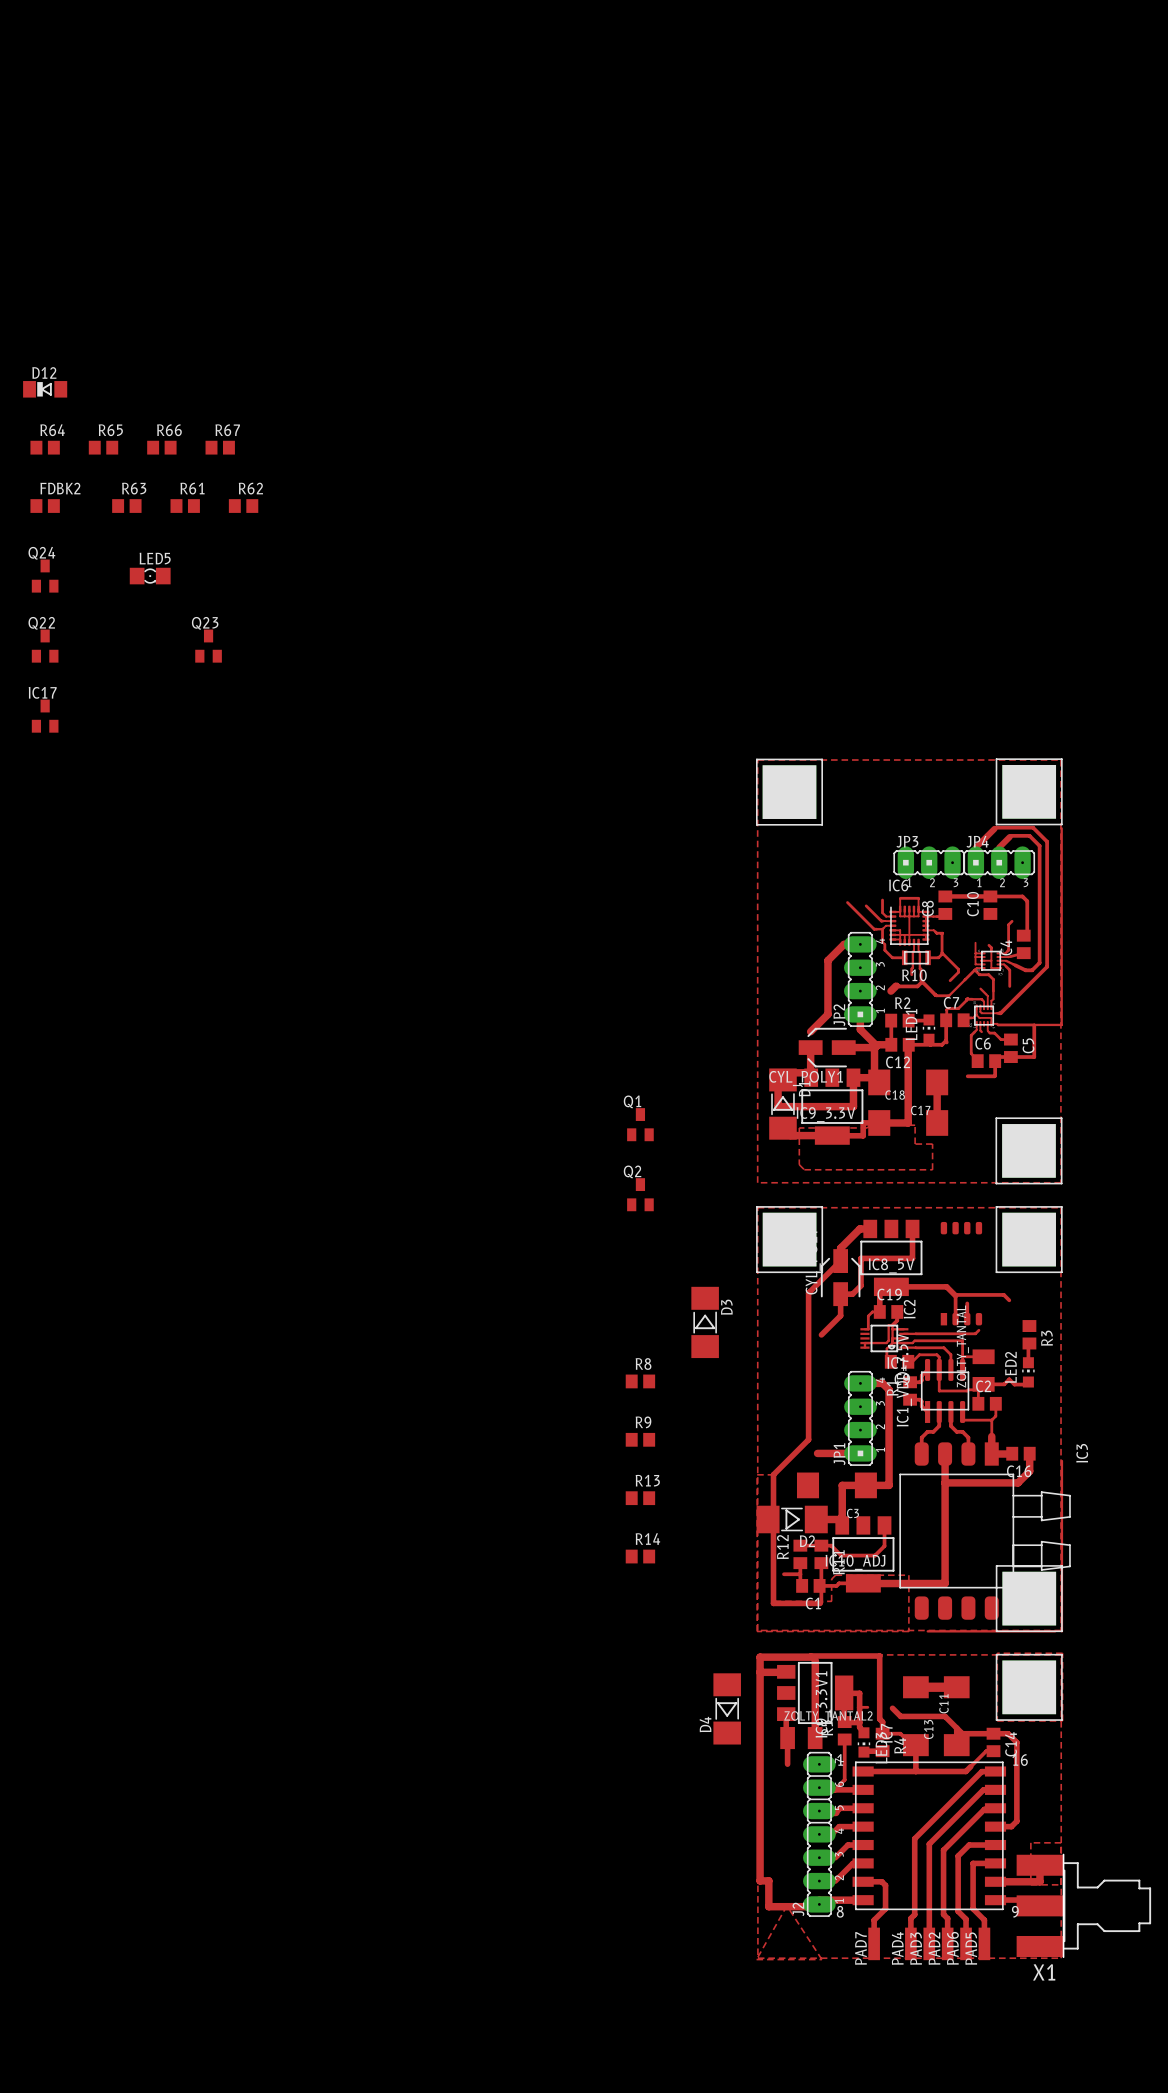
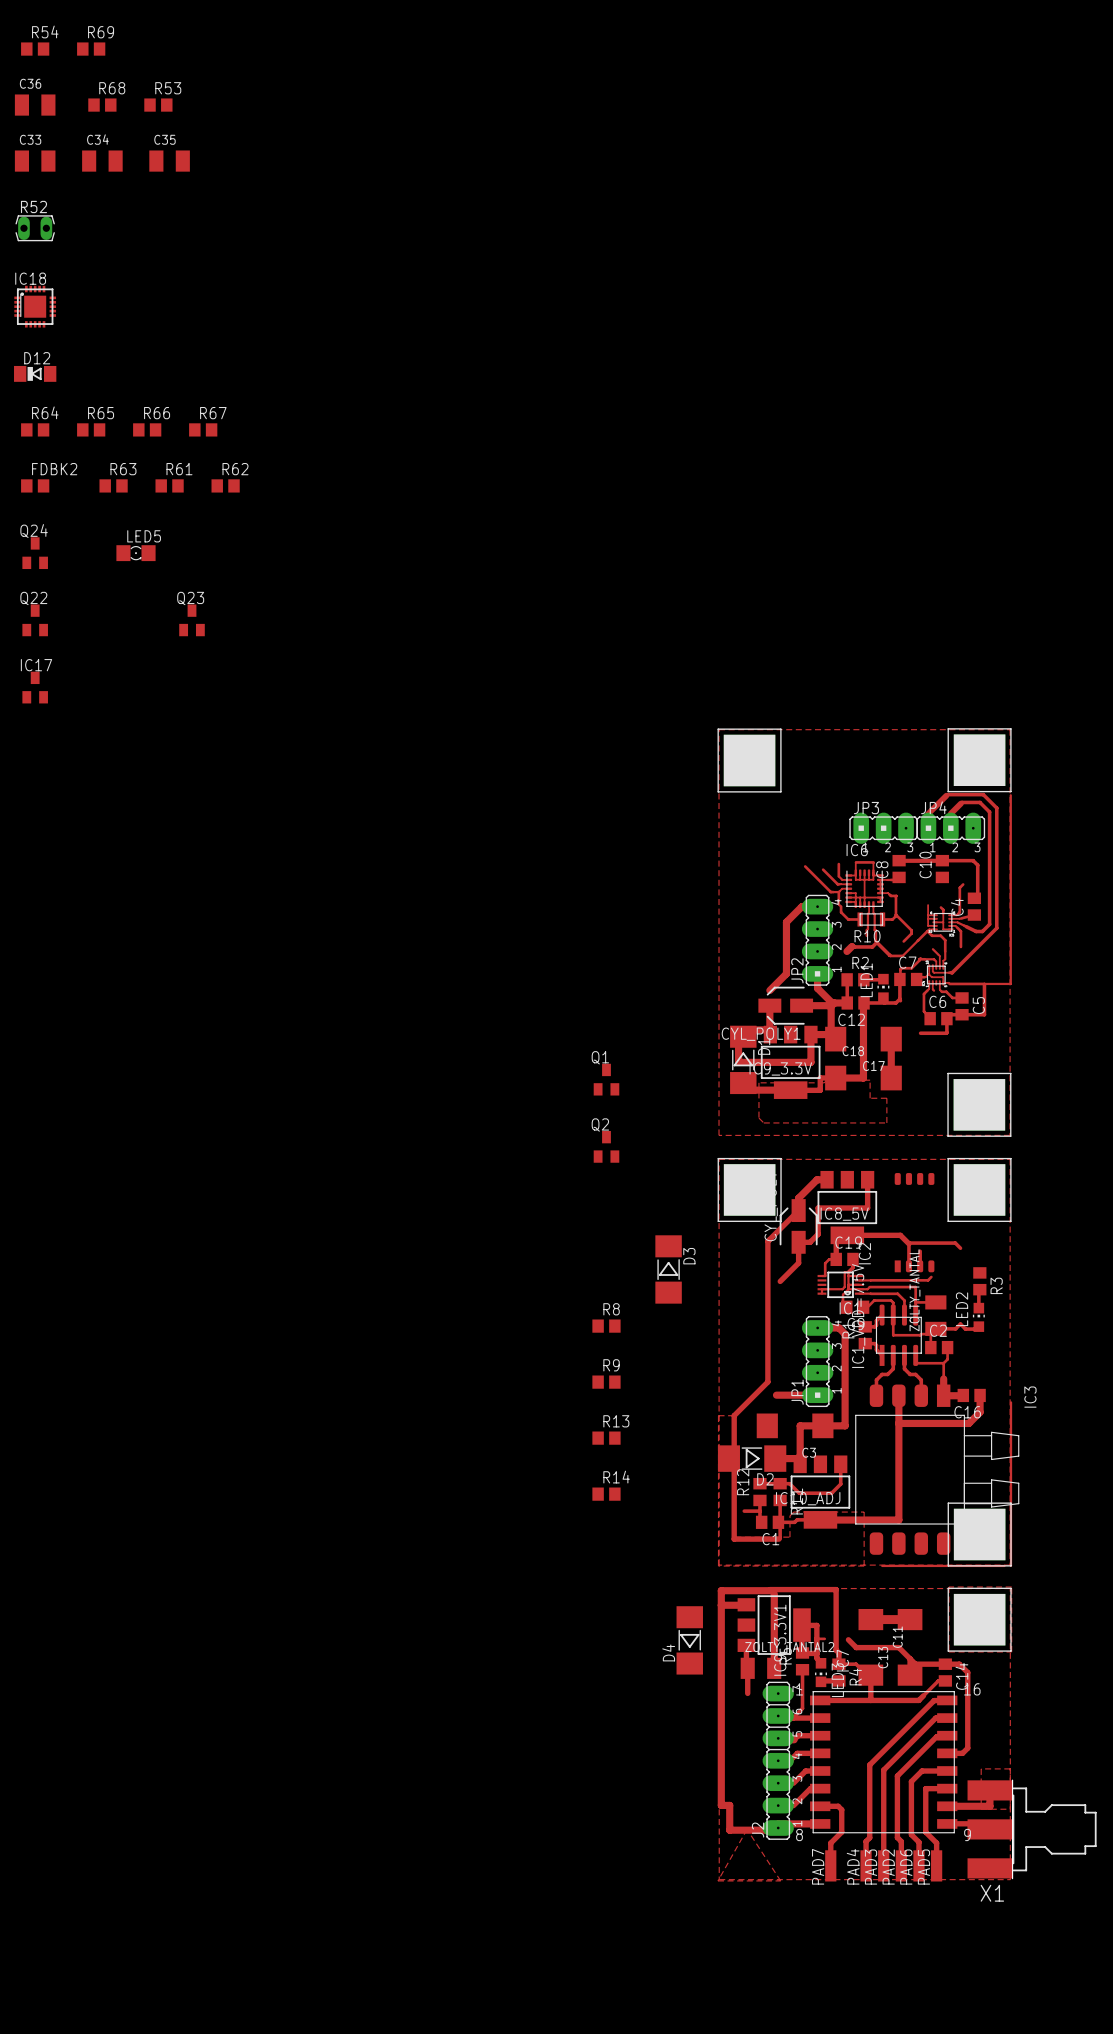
R54: none -> (35, 49)
R69: none -> (91, 49)
C36: none -> (35, 105)
R68: none -> (102, 105)
R53: none -> (158, 105)
C33: none -> (35, 161)
C34: none -> (102, 161)
C35: none -> (169, 161)
R52: none -> (35, 228)
IC18: none -> (35, 306)

